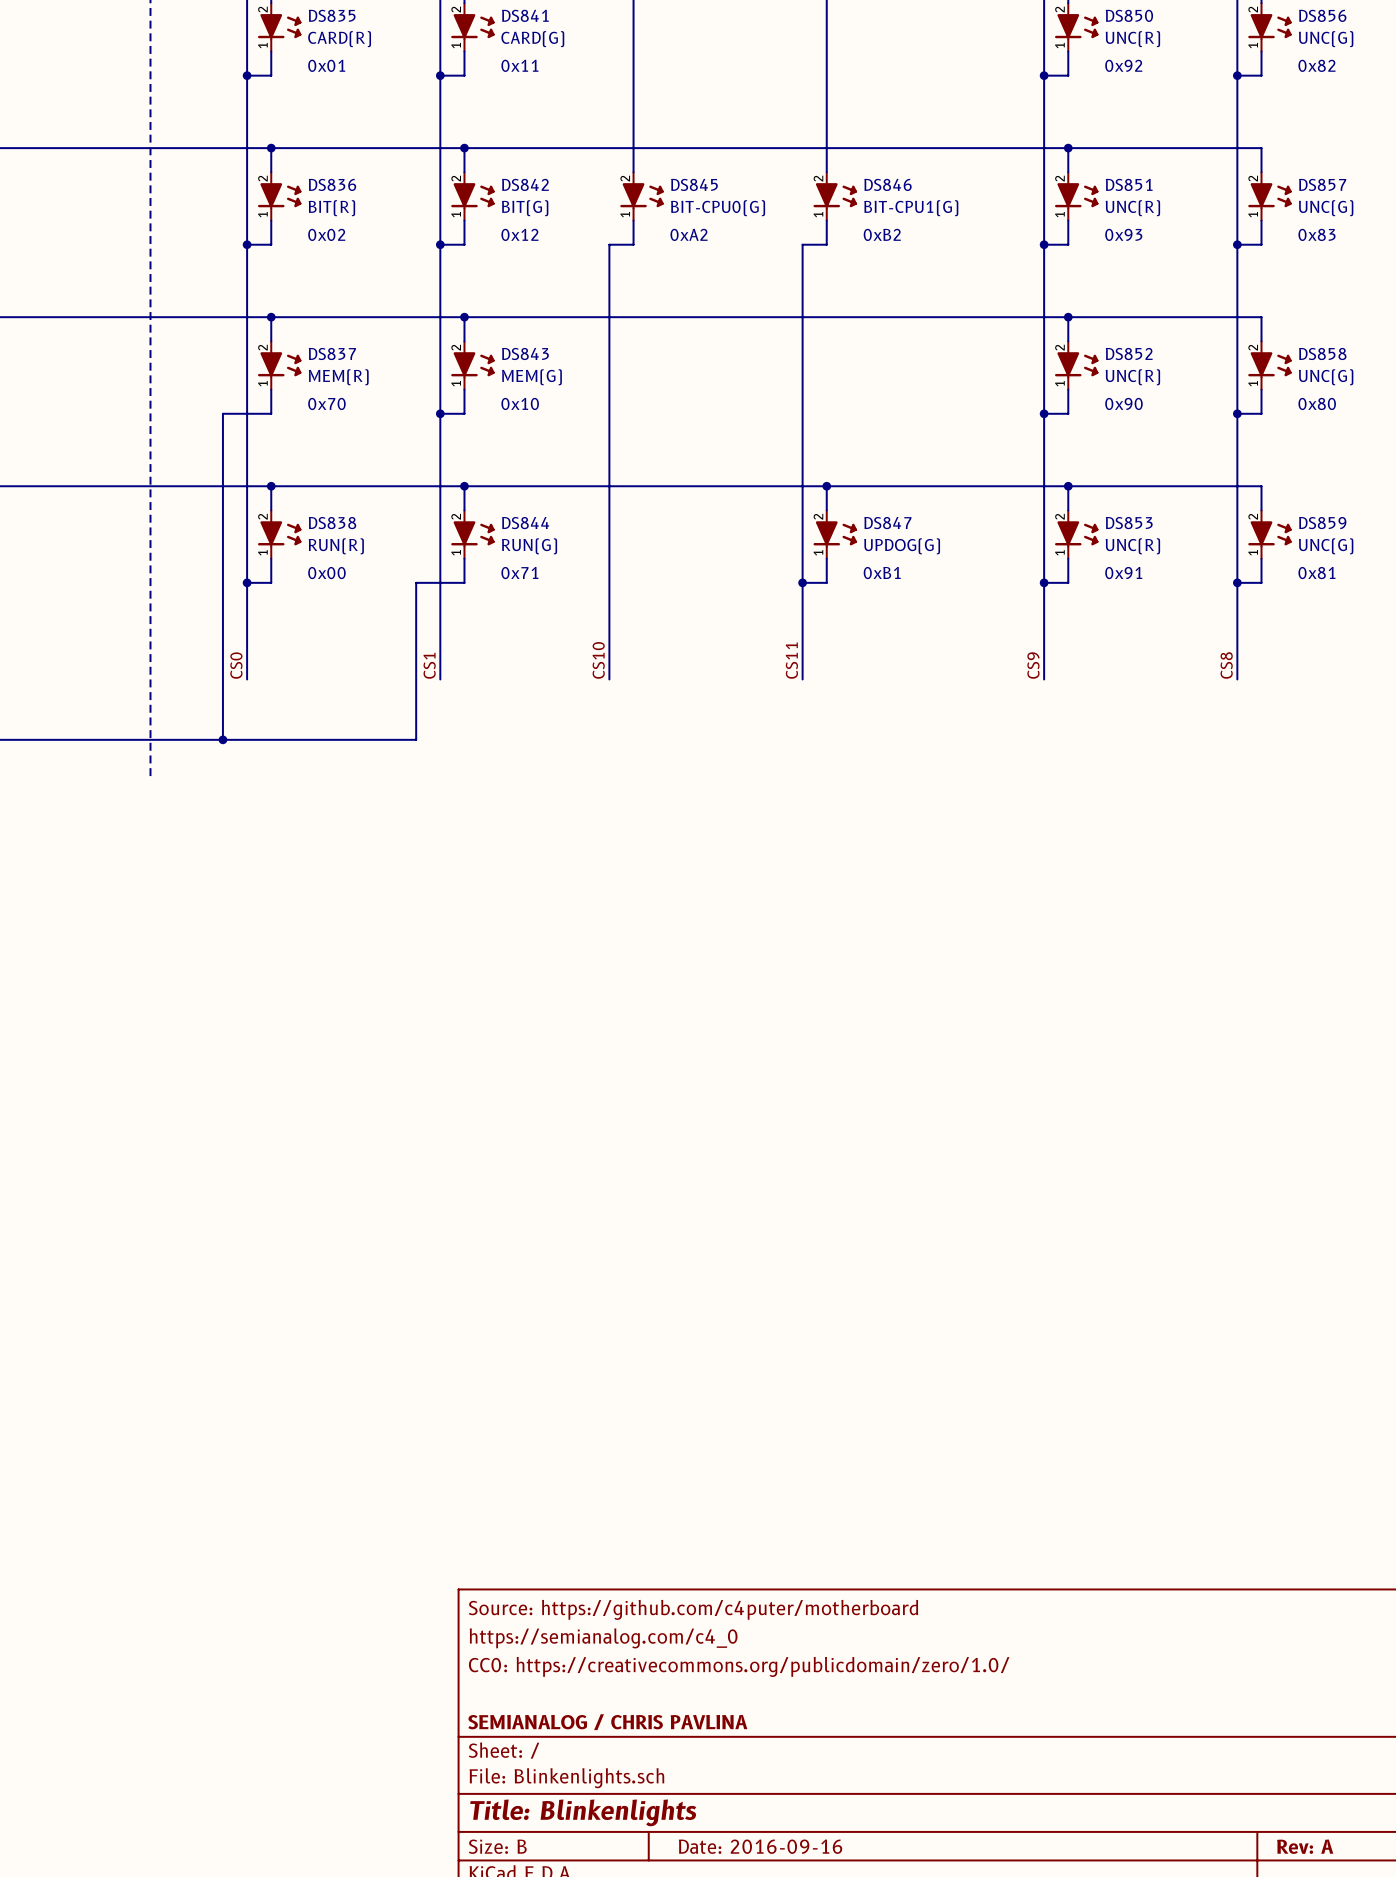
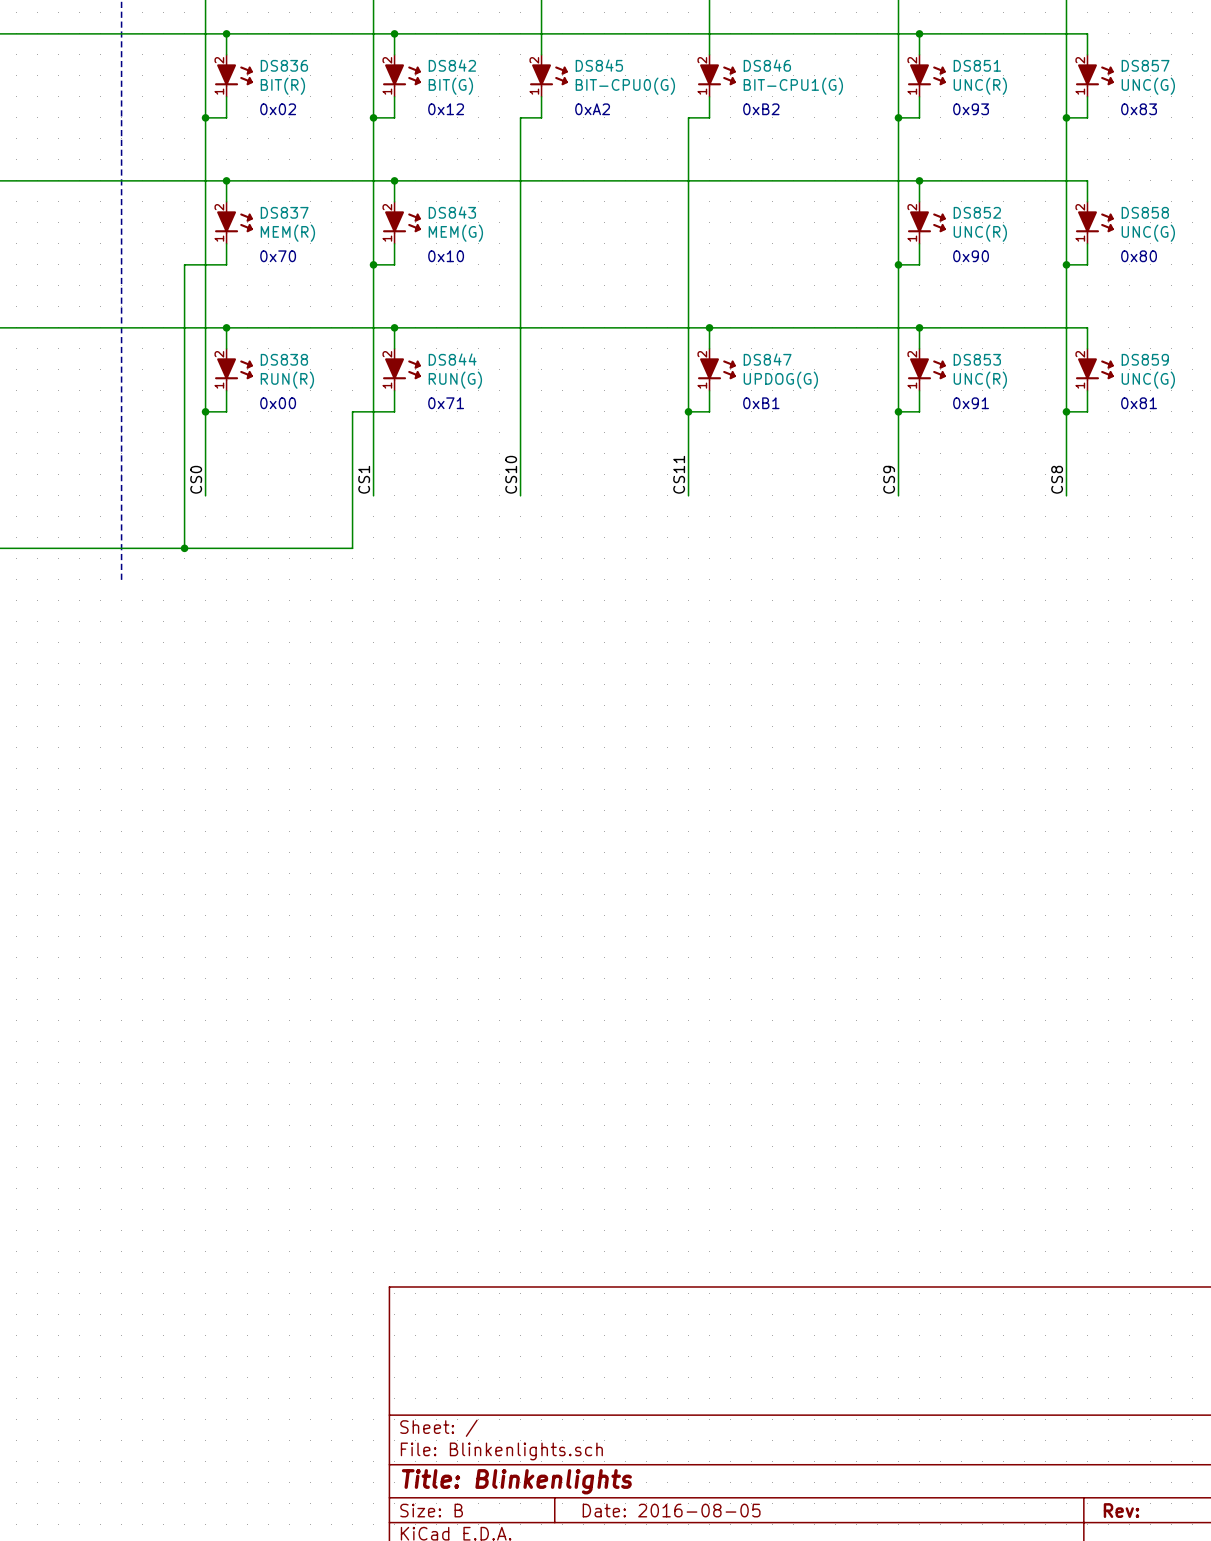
title block: Source: https://github.com/c4puter/motherboard (693, 1609) -> none
title block: https://semianalog.com/c4_0 (603, 1638) -> none
title block: CC0: https://creativecommons.org/publicdomain/zero/1.0/ (739, 1666) -> none
title block: SEMIANALOG / CHRIS PAVLINA (607, 1722) -> none
title block: Date: 2016-09-16 (760, 1846) -> Date: 2016-08-05 (671, 1510)
title block: Rev: A (1305, 1846) -> Rev: (1121, 1510)

